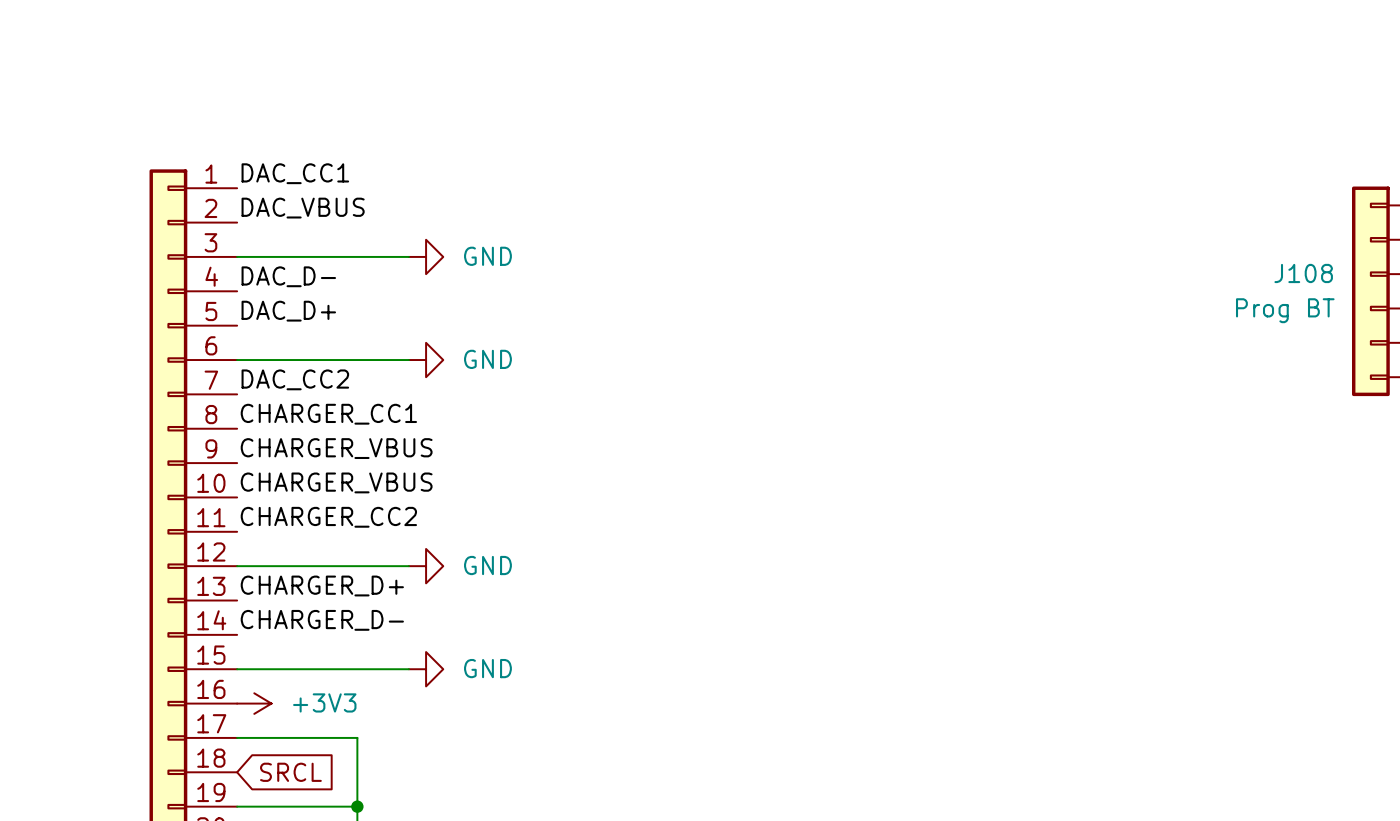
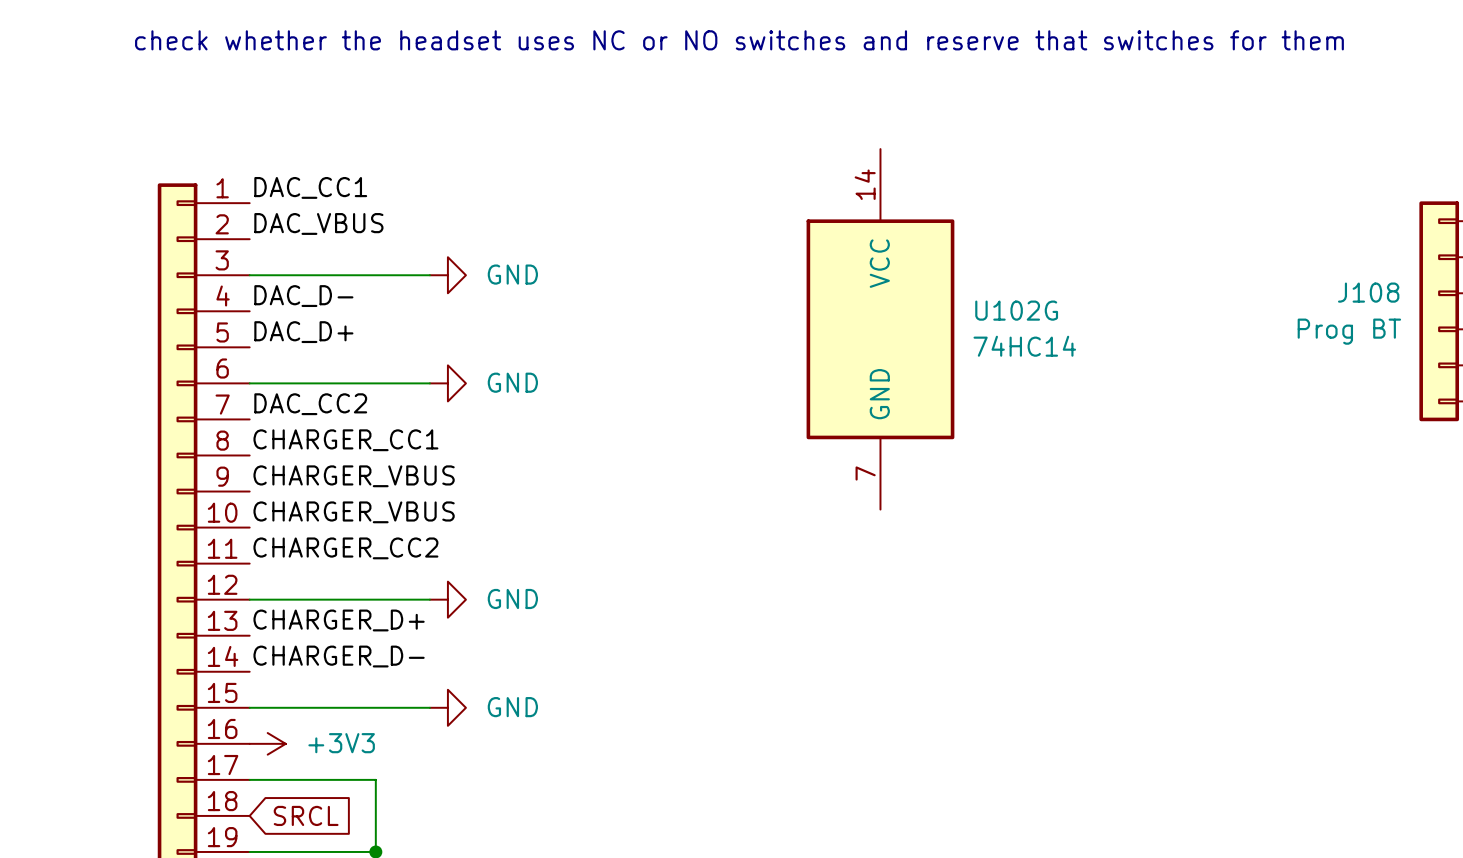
text: none -> check whether the headset uses NC or NO switches and reserve that switches for them (739, 40)
U102G: none -> 74HC14 (880, 329)

